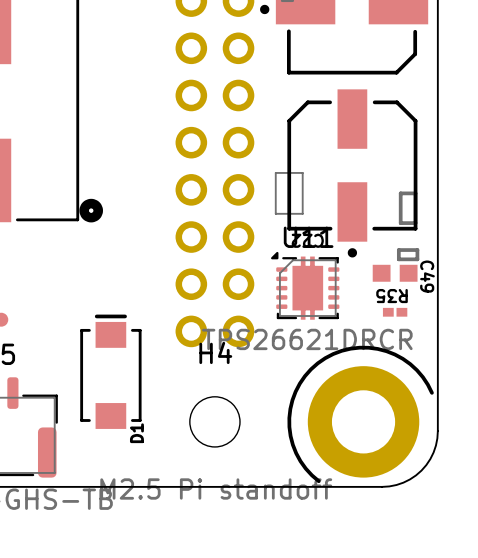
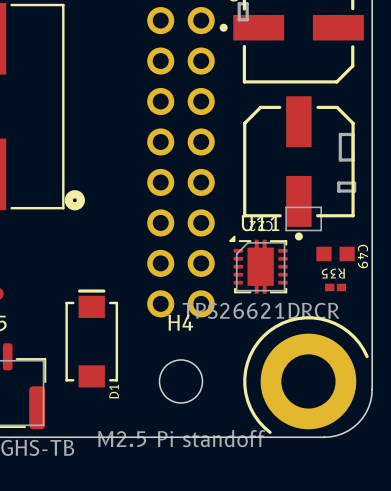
part: none -> (346, 147)
part footprint: [398, 191, 418, 225] -> [337, 181, 357, 193]
part rotation: 0° (289, 193) -> 90° clockwise (303, 218)
part position: (289, 193) -> (303, 218)
part: (408, 254) -> none

